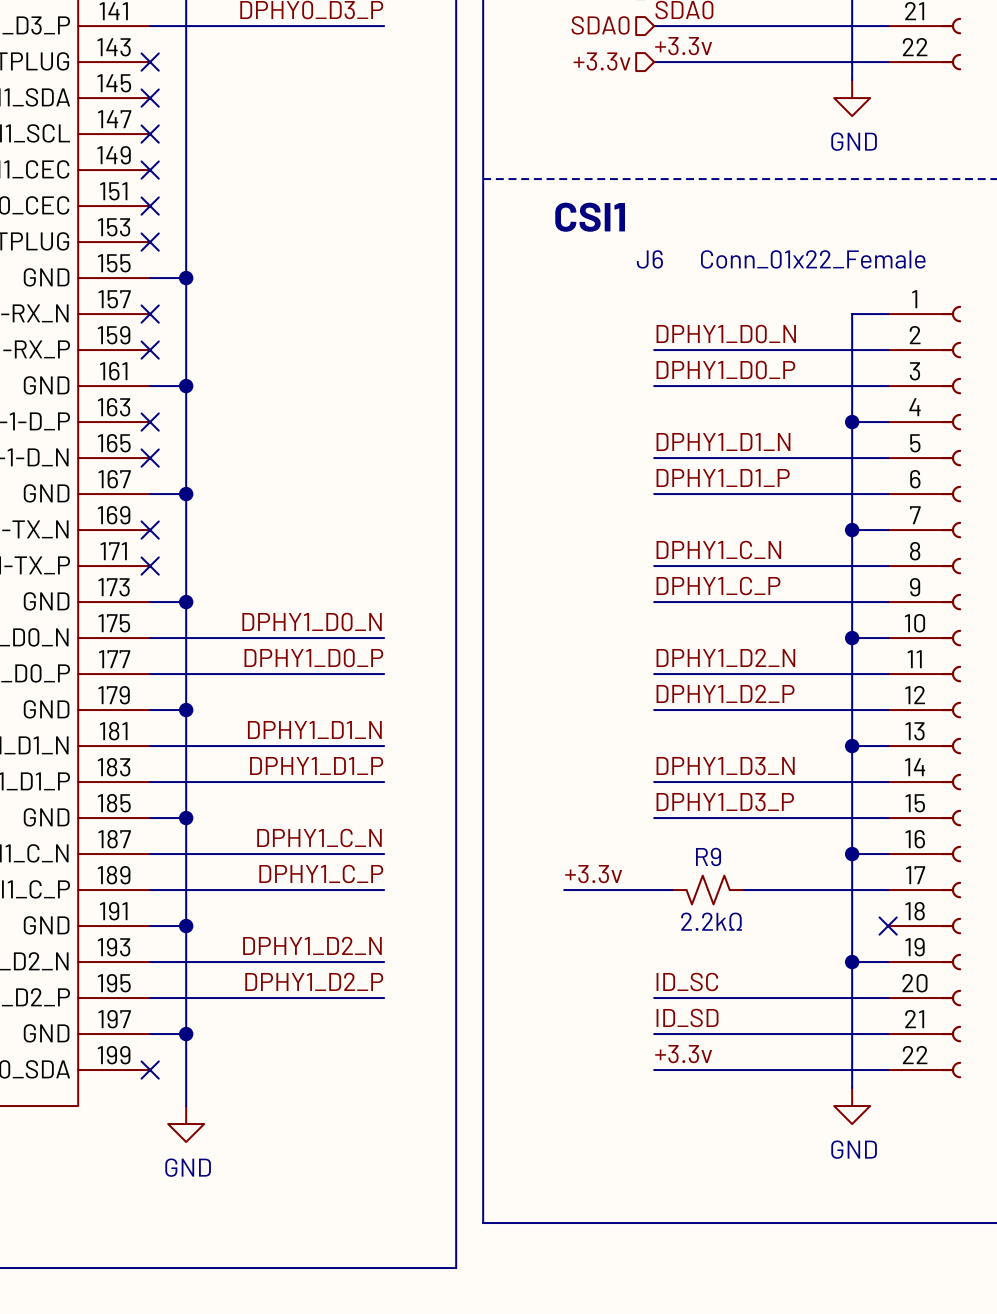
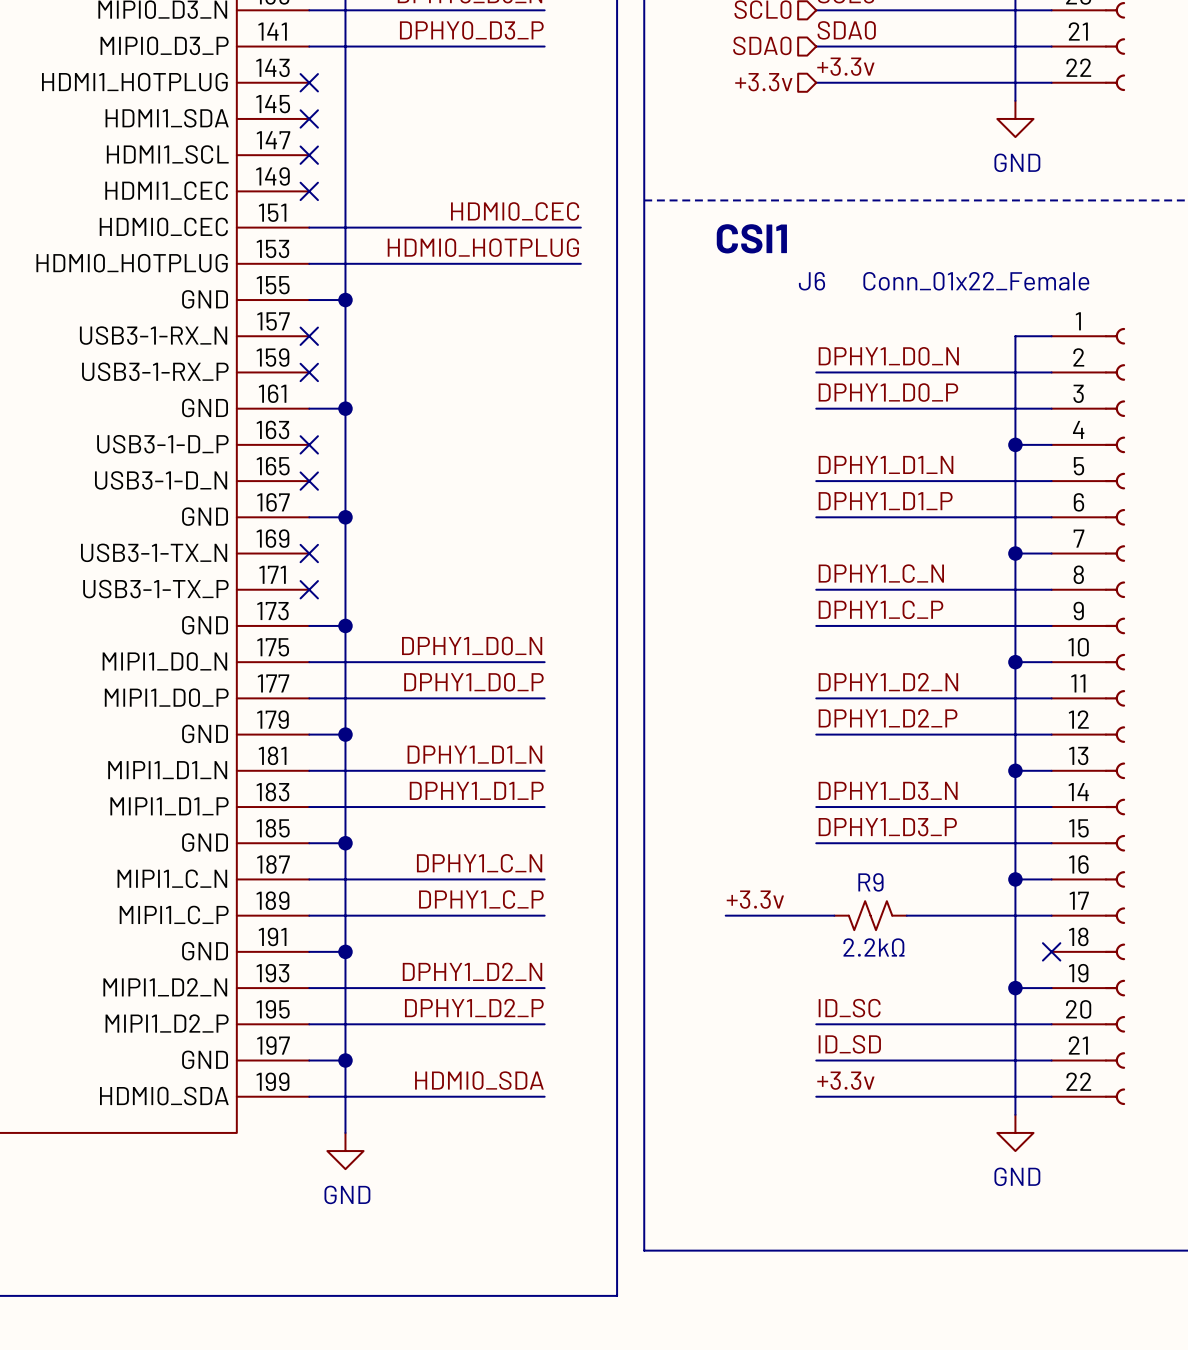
label: none -> HDMI0_CEC (515, 211)
wire: none -> (309, 227) (580, 227)
no-connect mark: (150, 206) -> none
label: none -> HDMI0_HOTPLUG (483, 247)
wire: none -> (309, 263) (580, 263)
no-connect mark: (150, 242) -> none
label: none -> HDMI0_SDA (479, 1080)
wire: none -> (309, 1096) (544, 1096)
no-connect mark: (150, 1070) -> none

